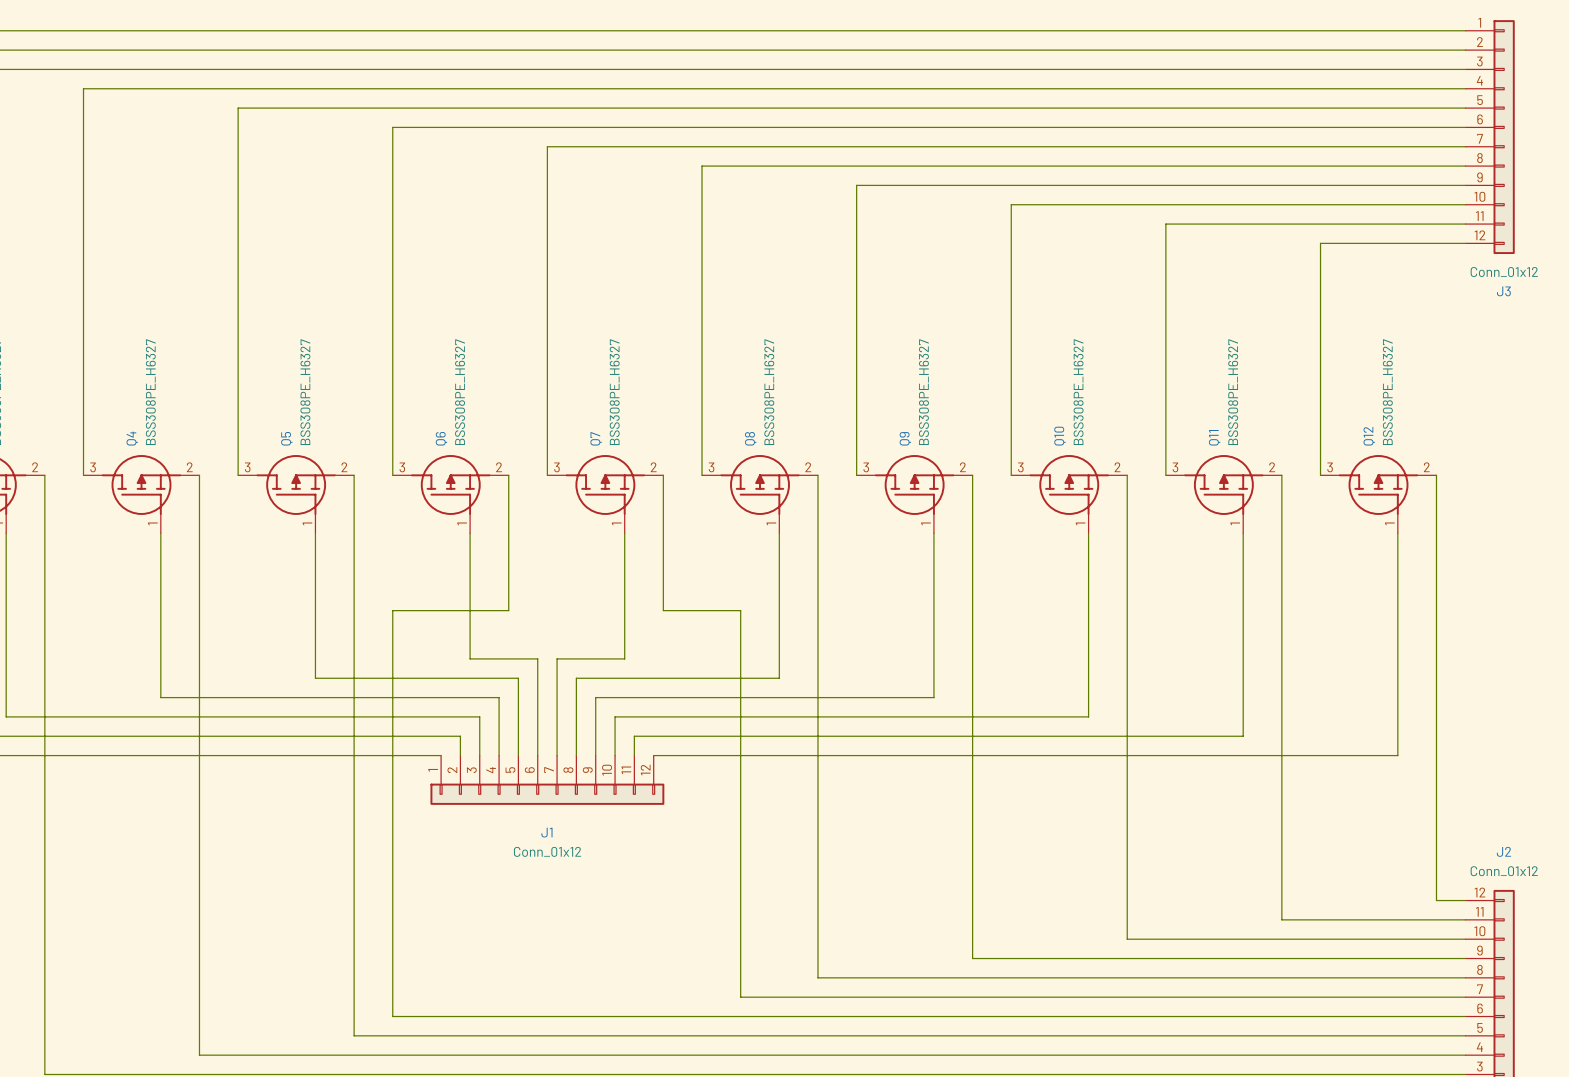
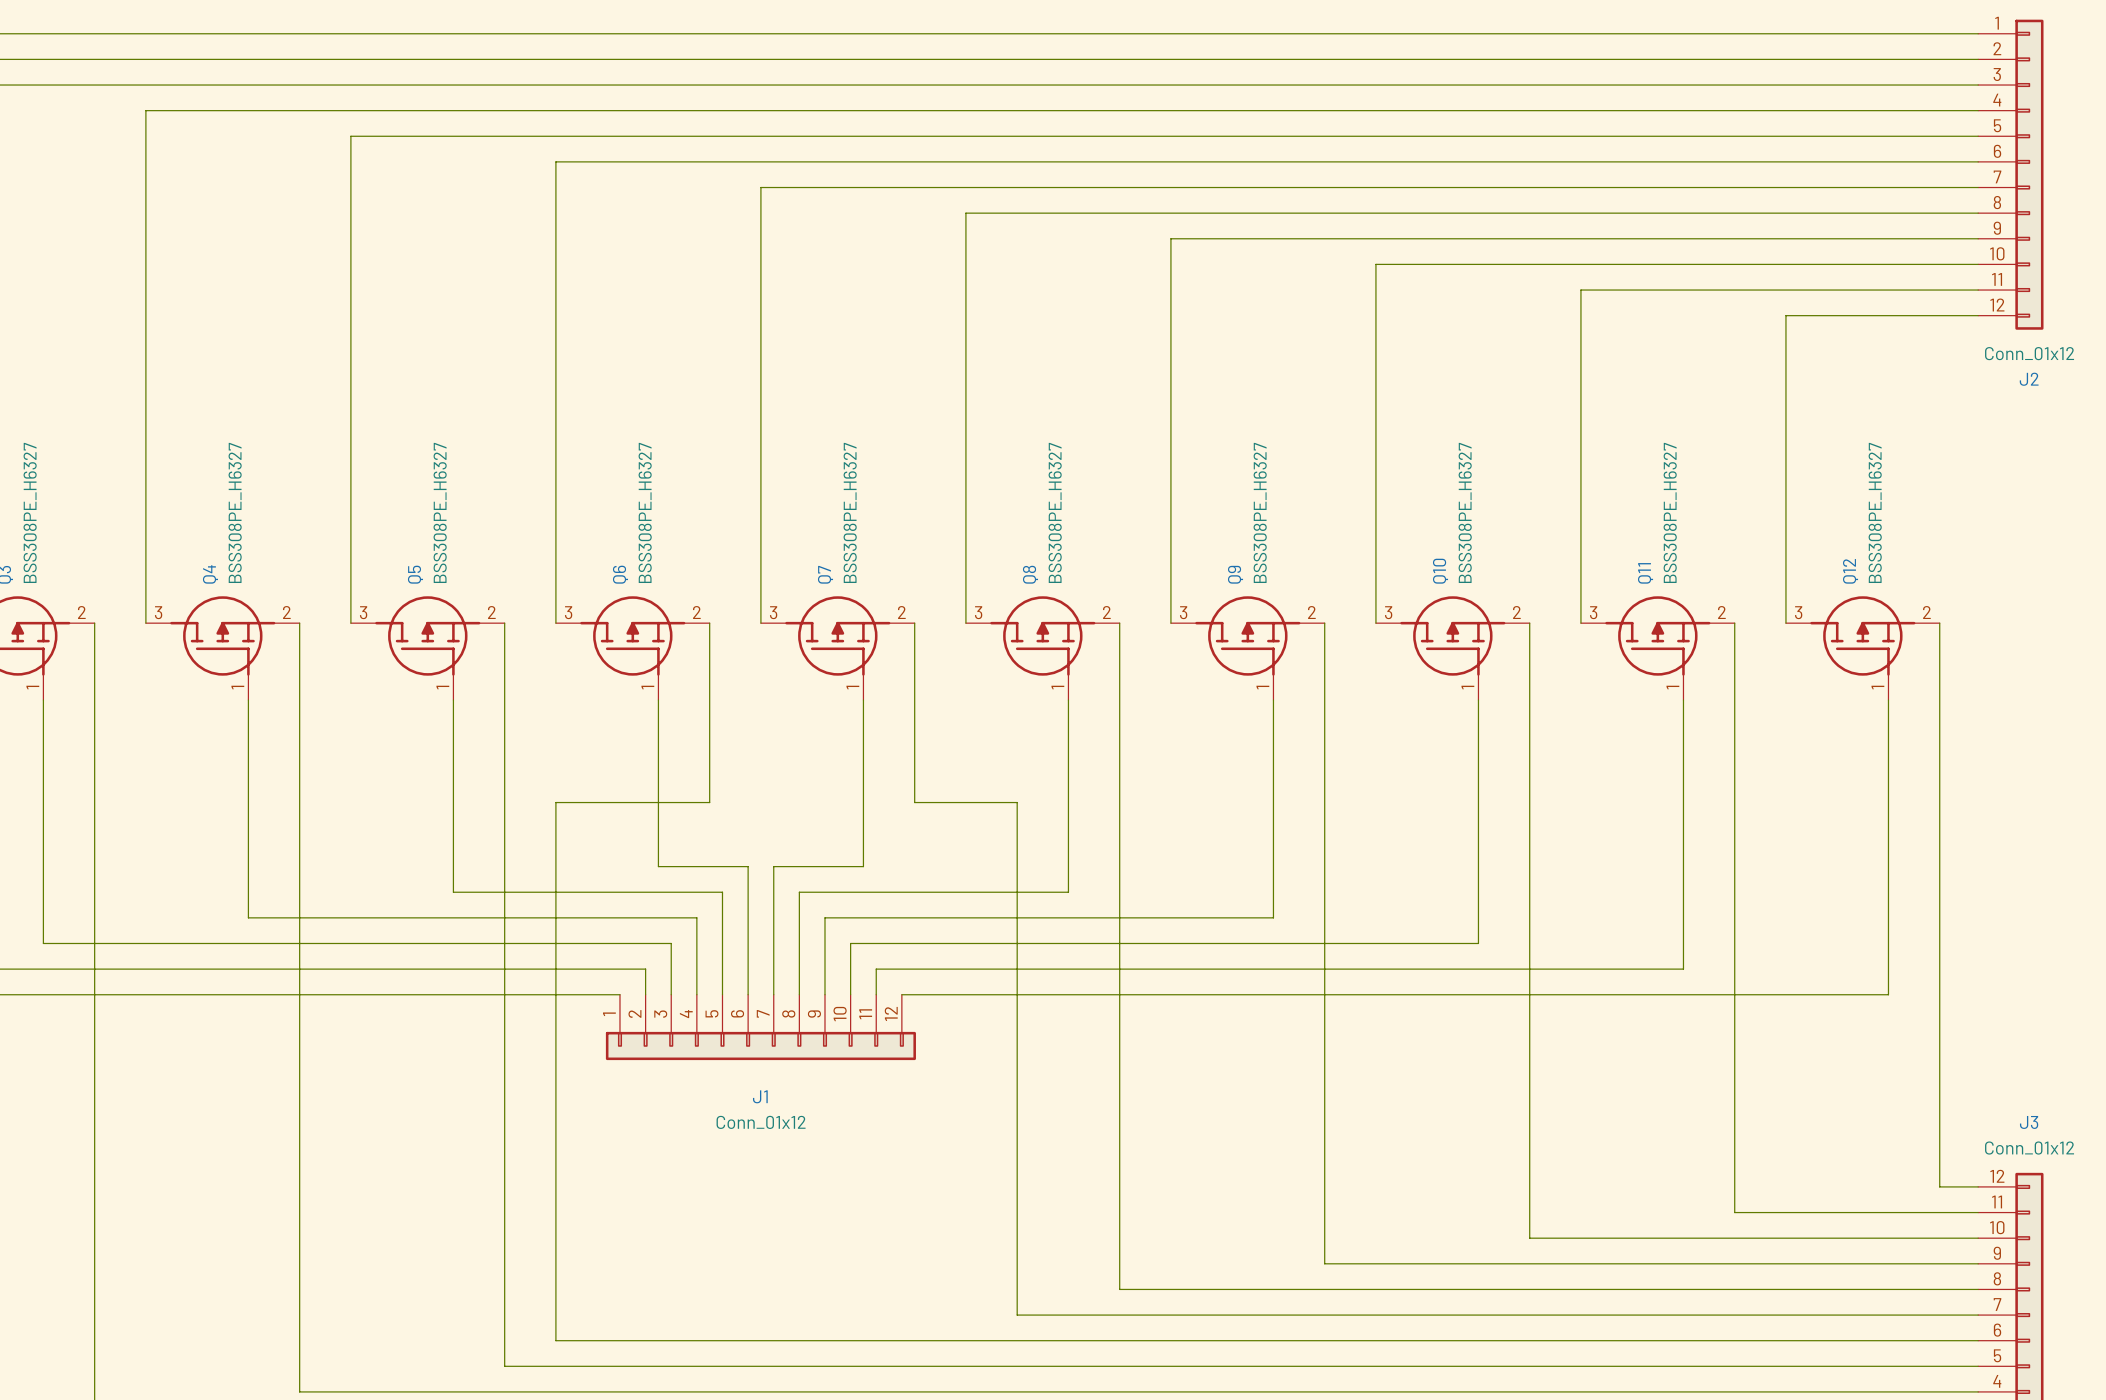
J3 name: J3 (1503, 291) -> J2 (2029, 379)
J2 name: J2 (1503, 851) -> J3 (2029, 1122)

